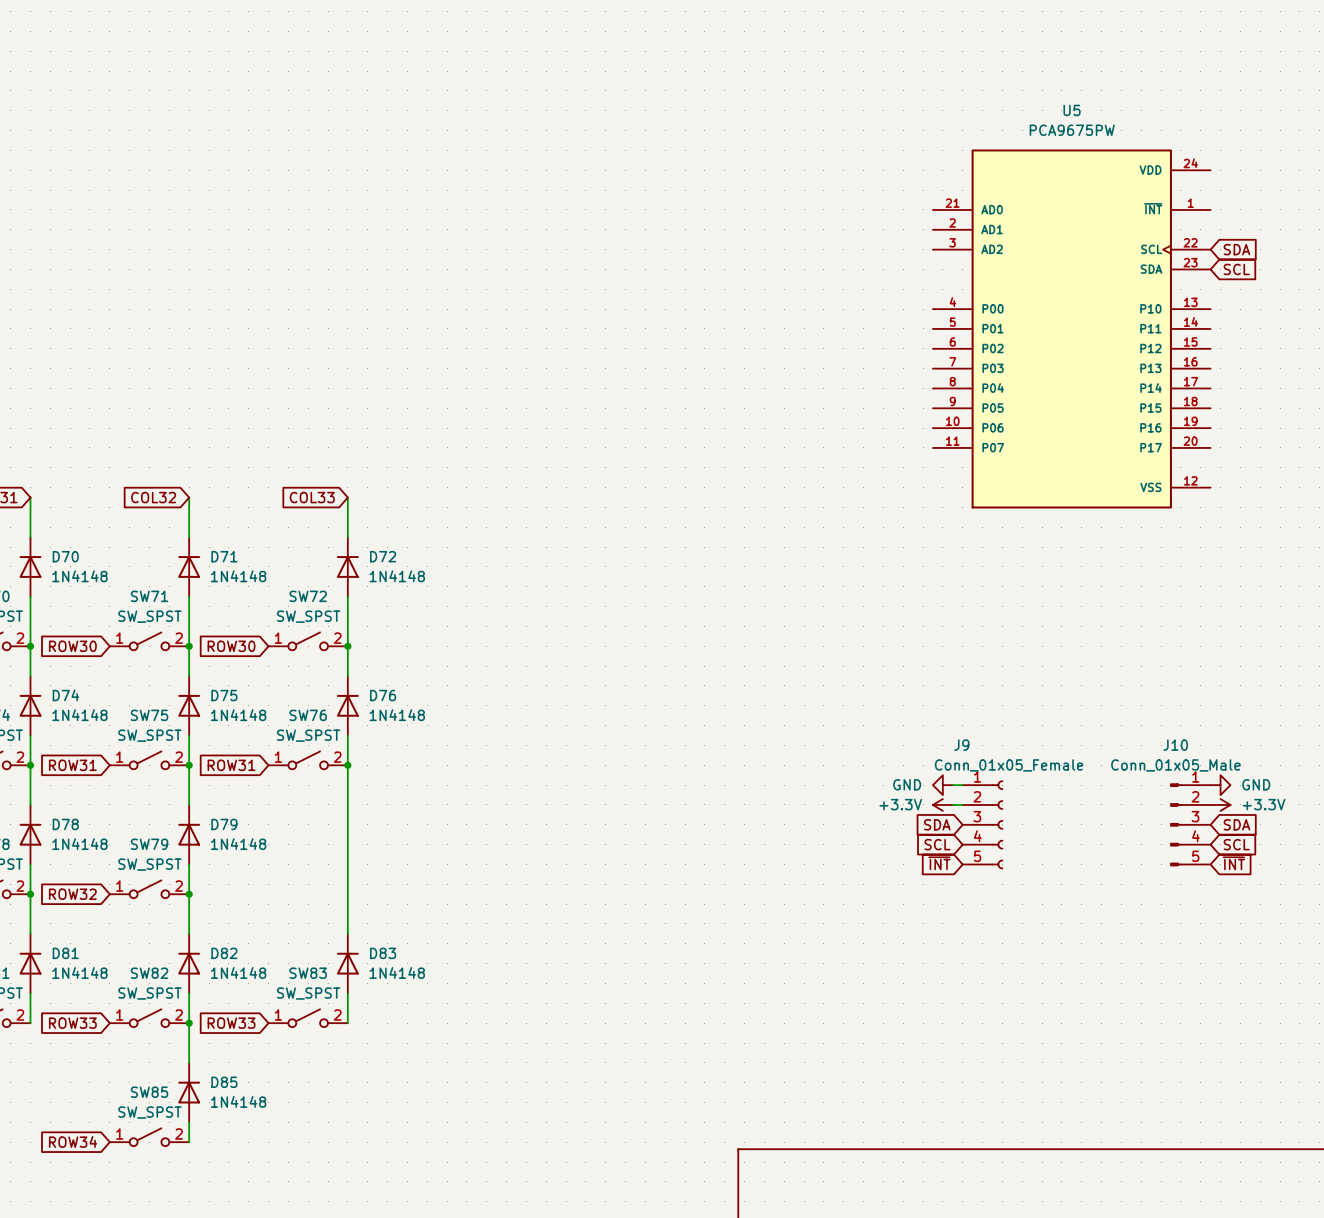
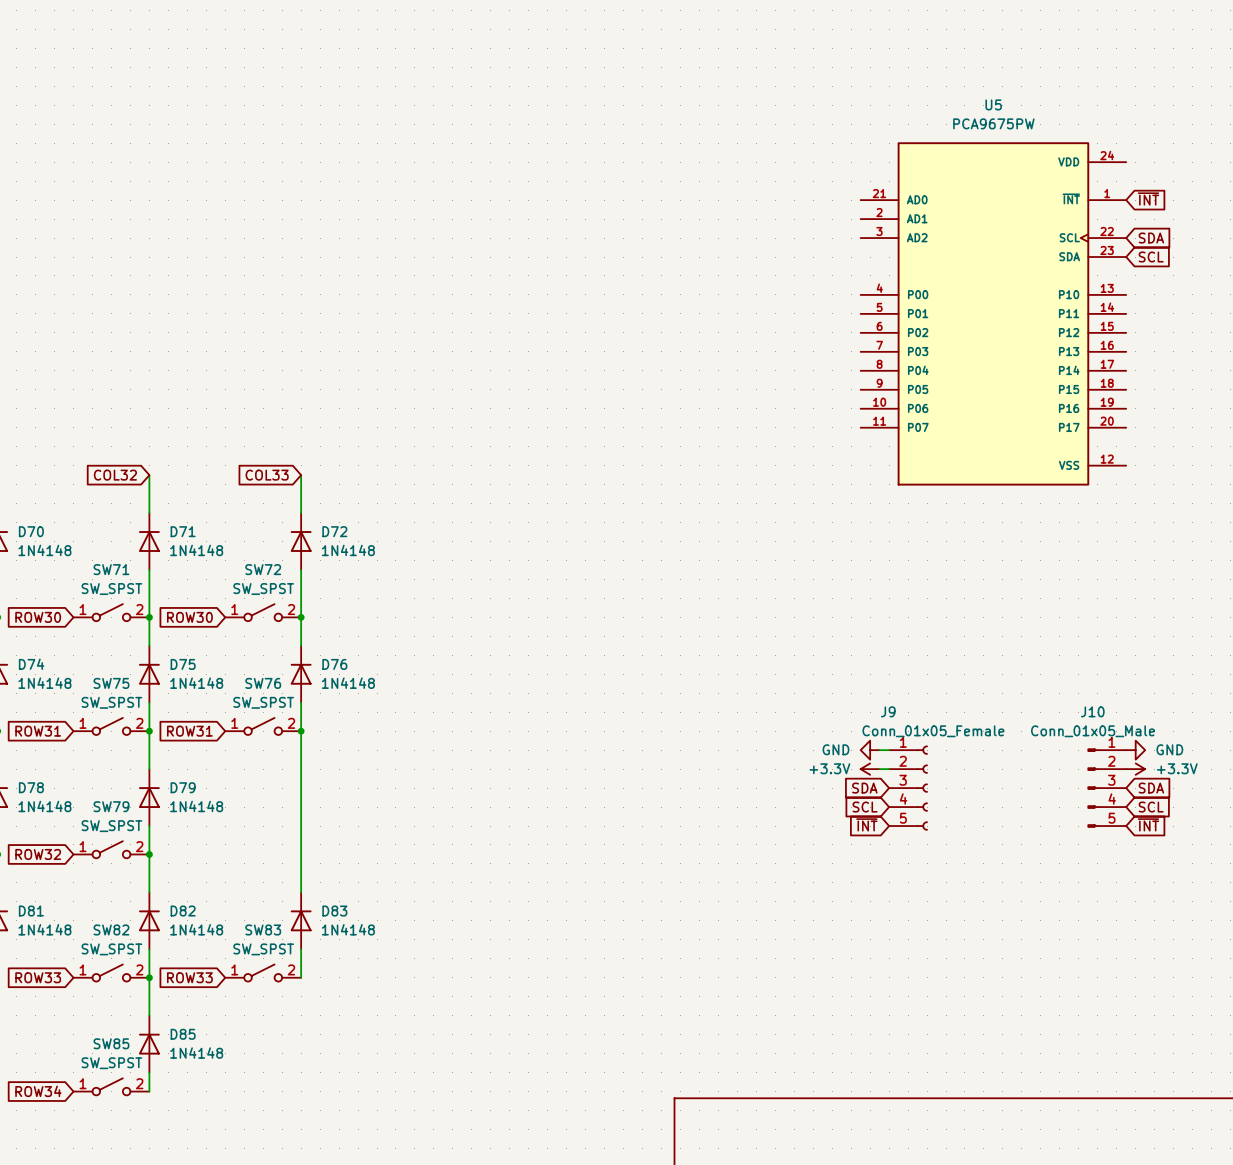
global label: none -> ~{INT} (1148, 199)

